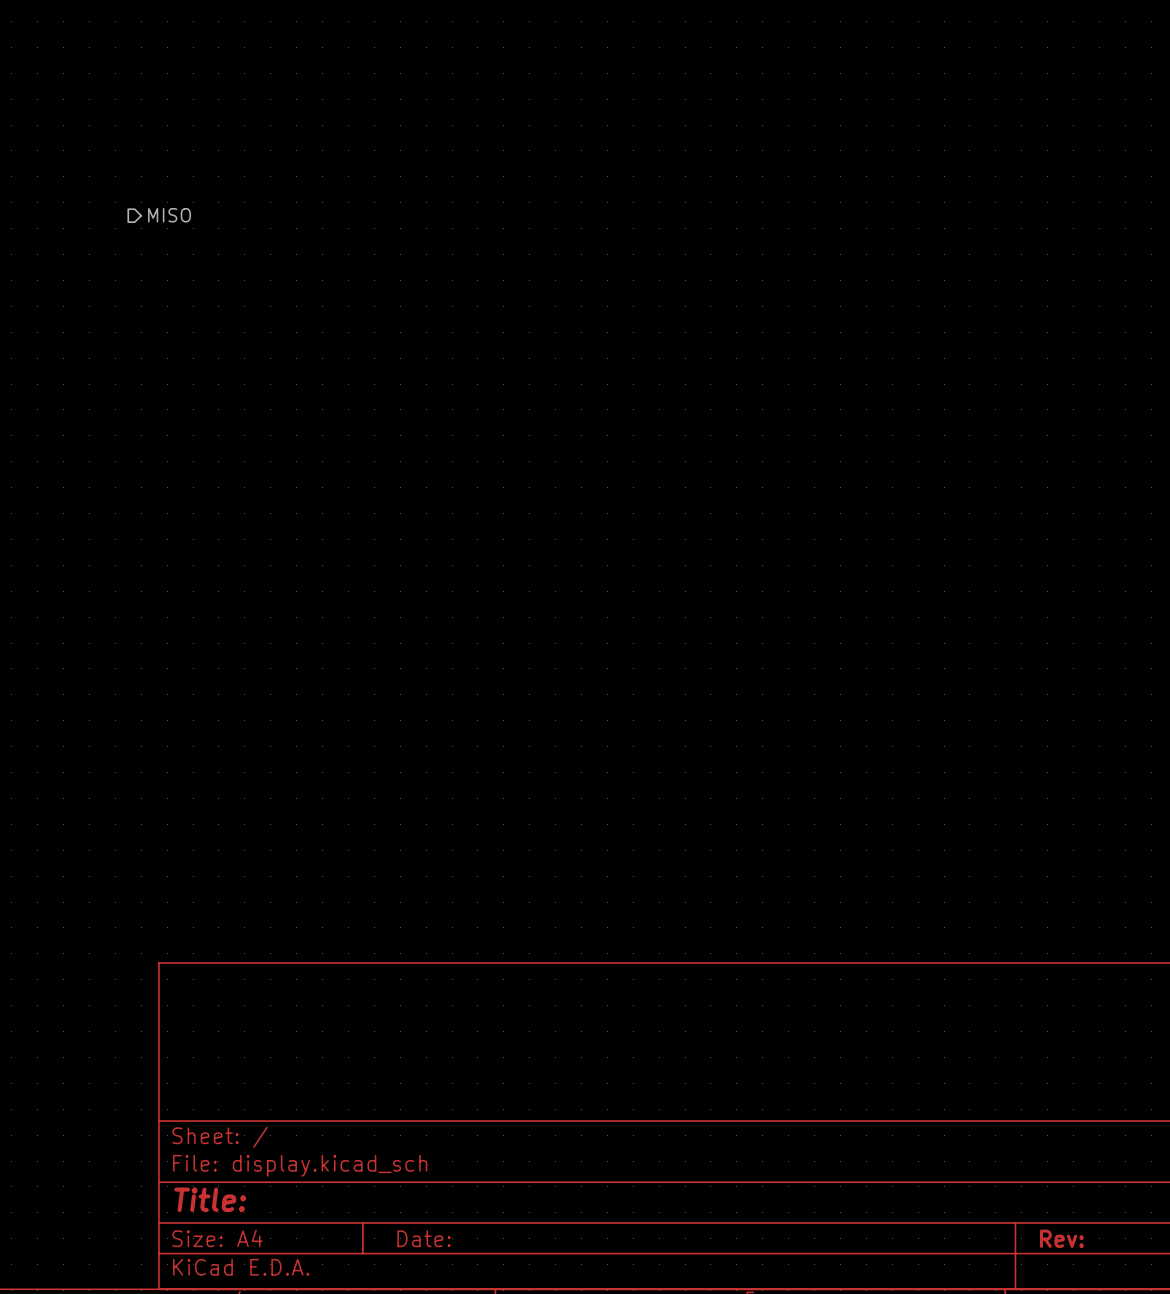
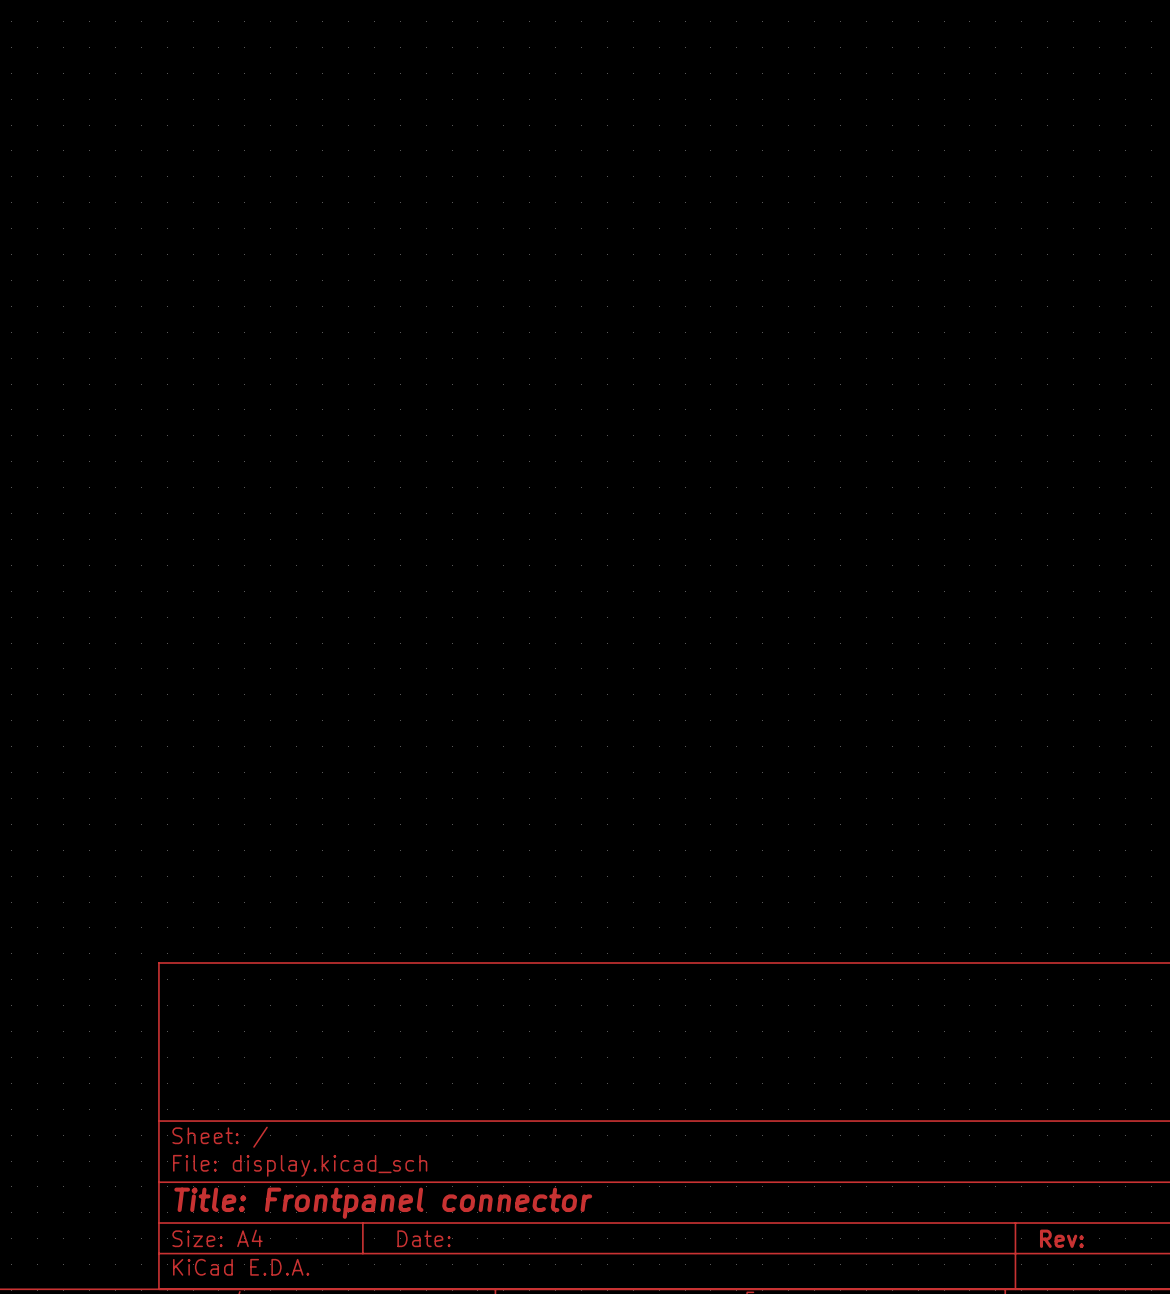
hierarchical label: MISO (169, 215) -> none
title block: Title: (210, 1199) -> Title: Frontpanel connector (383, 1203)

